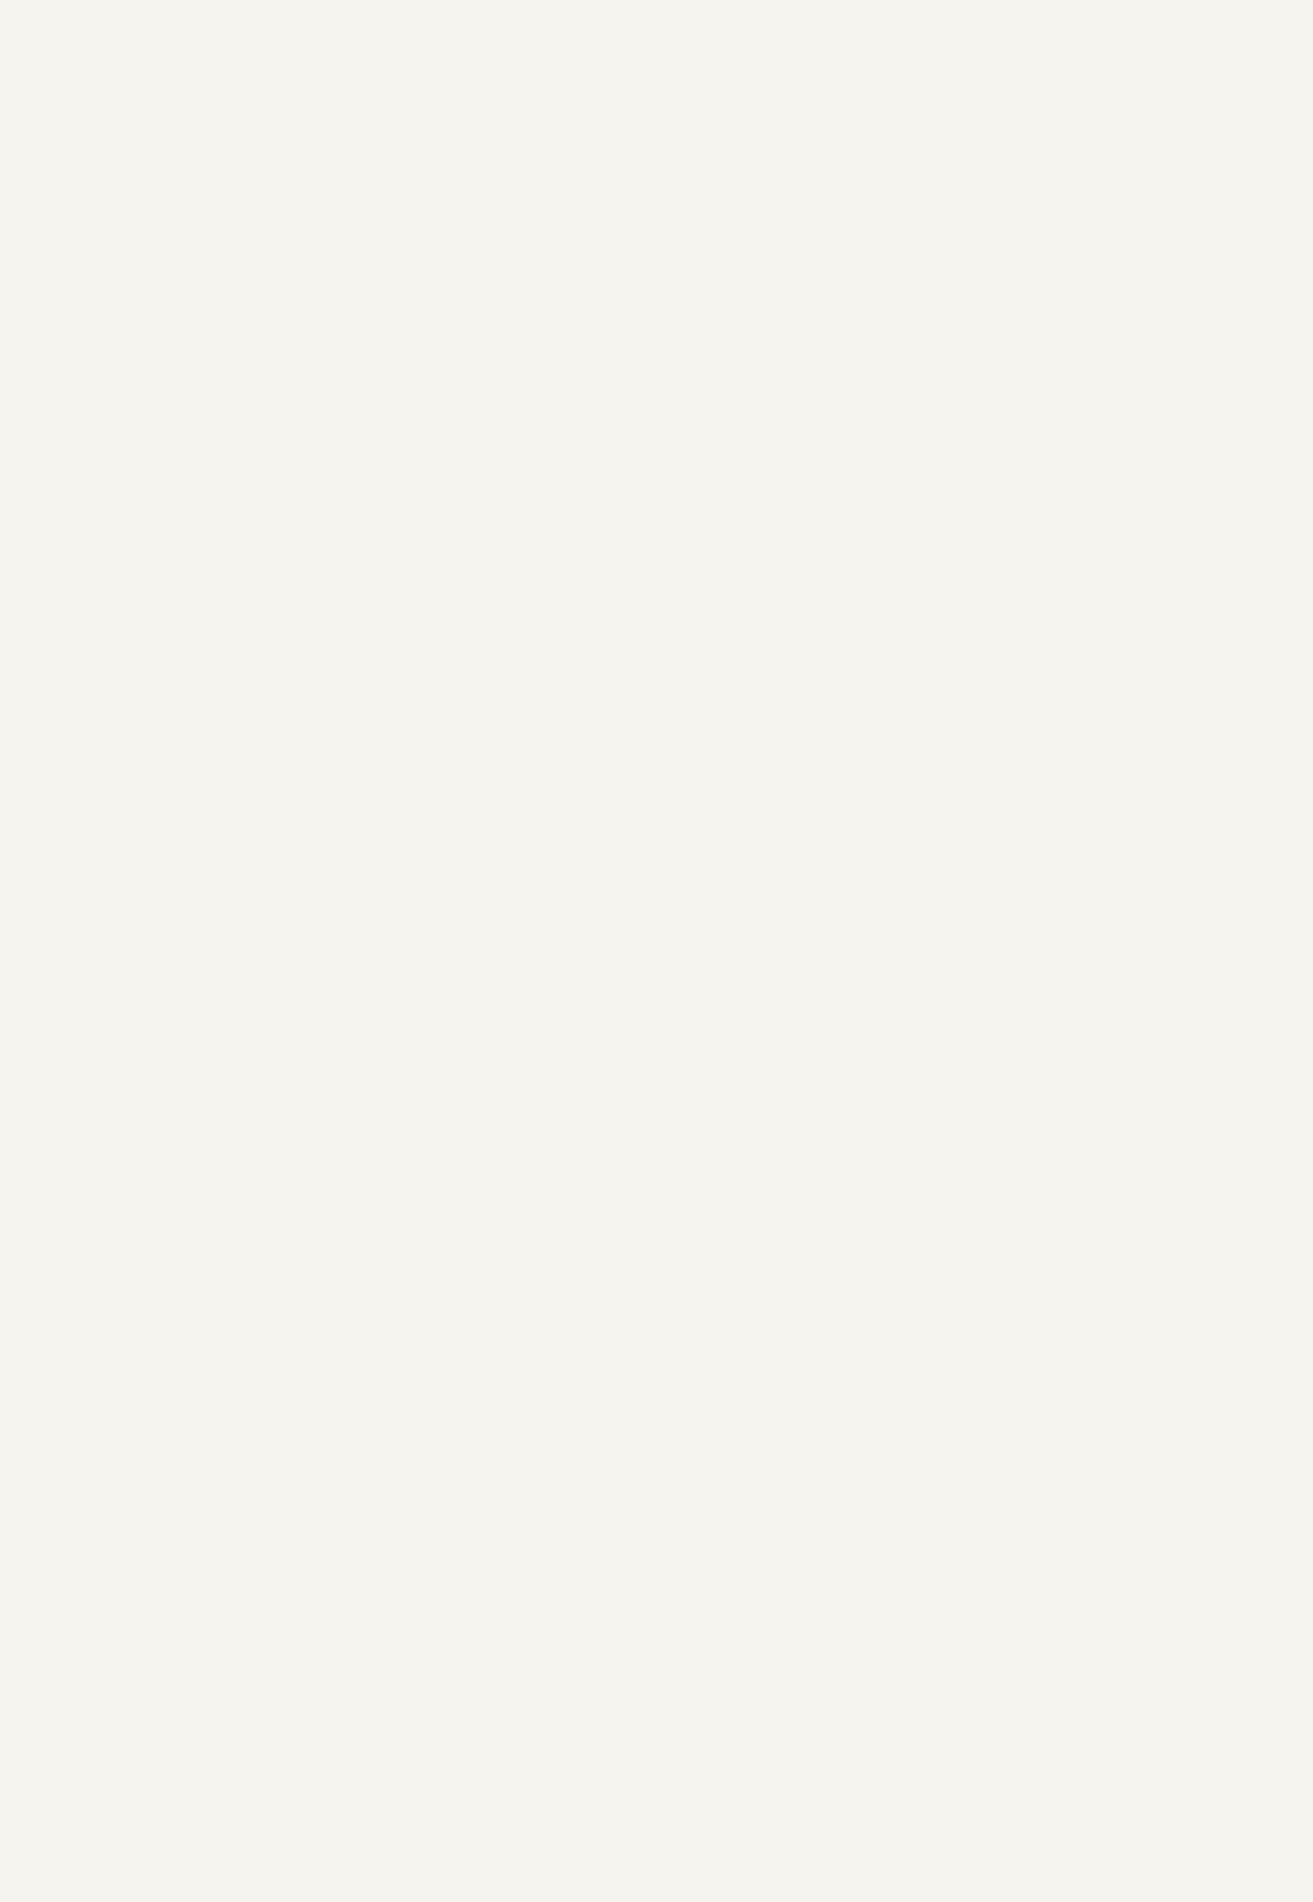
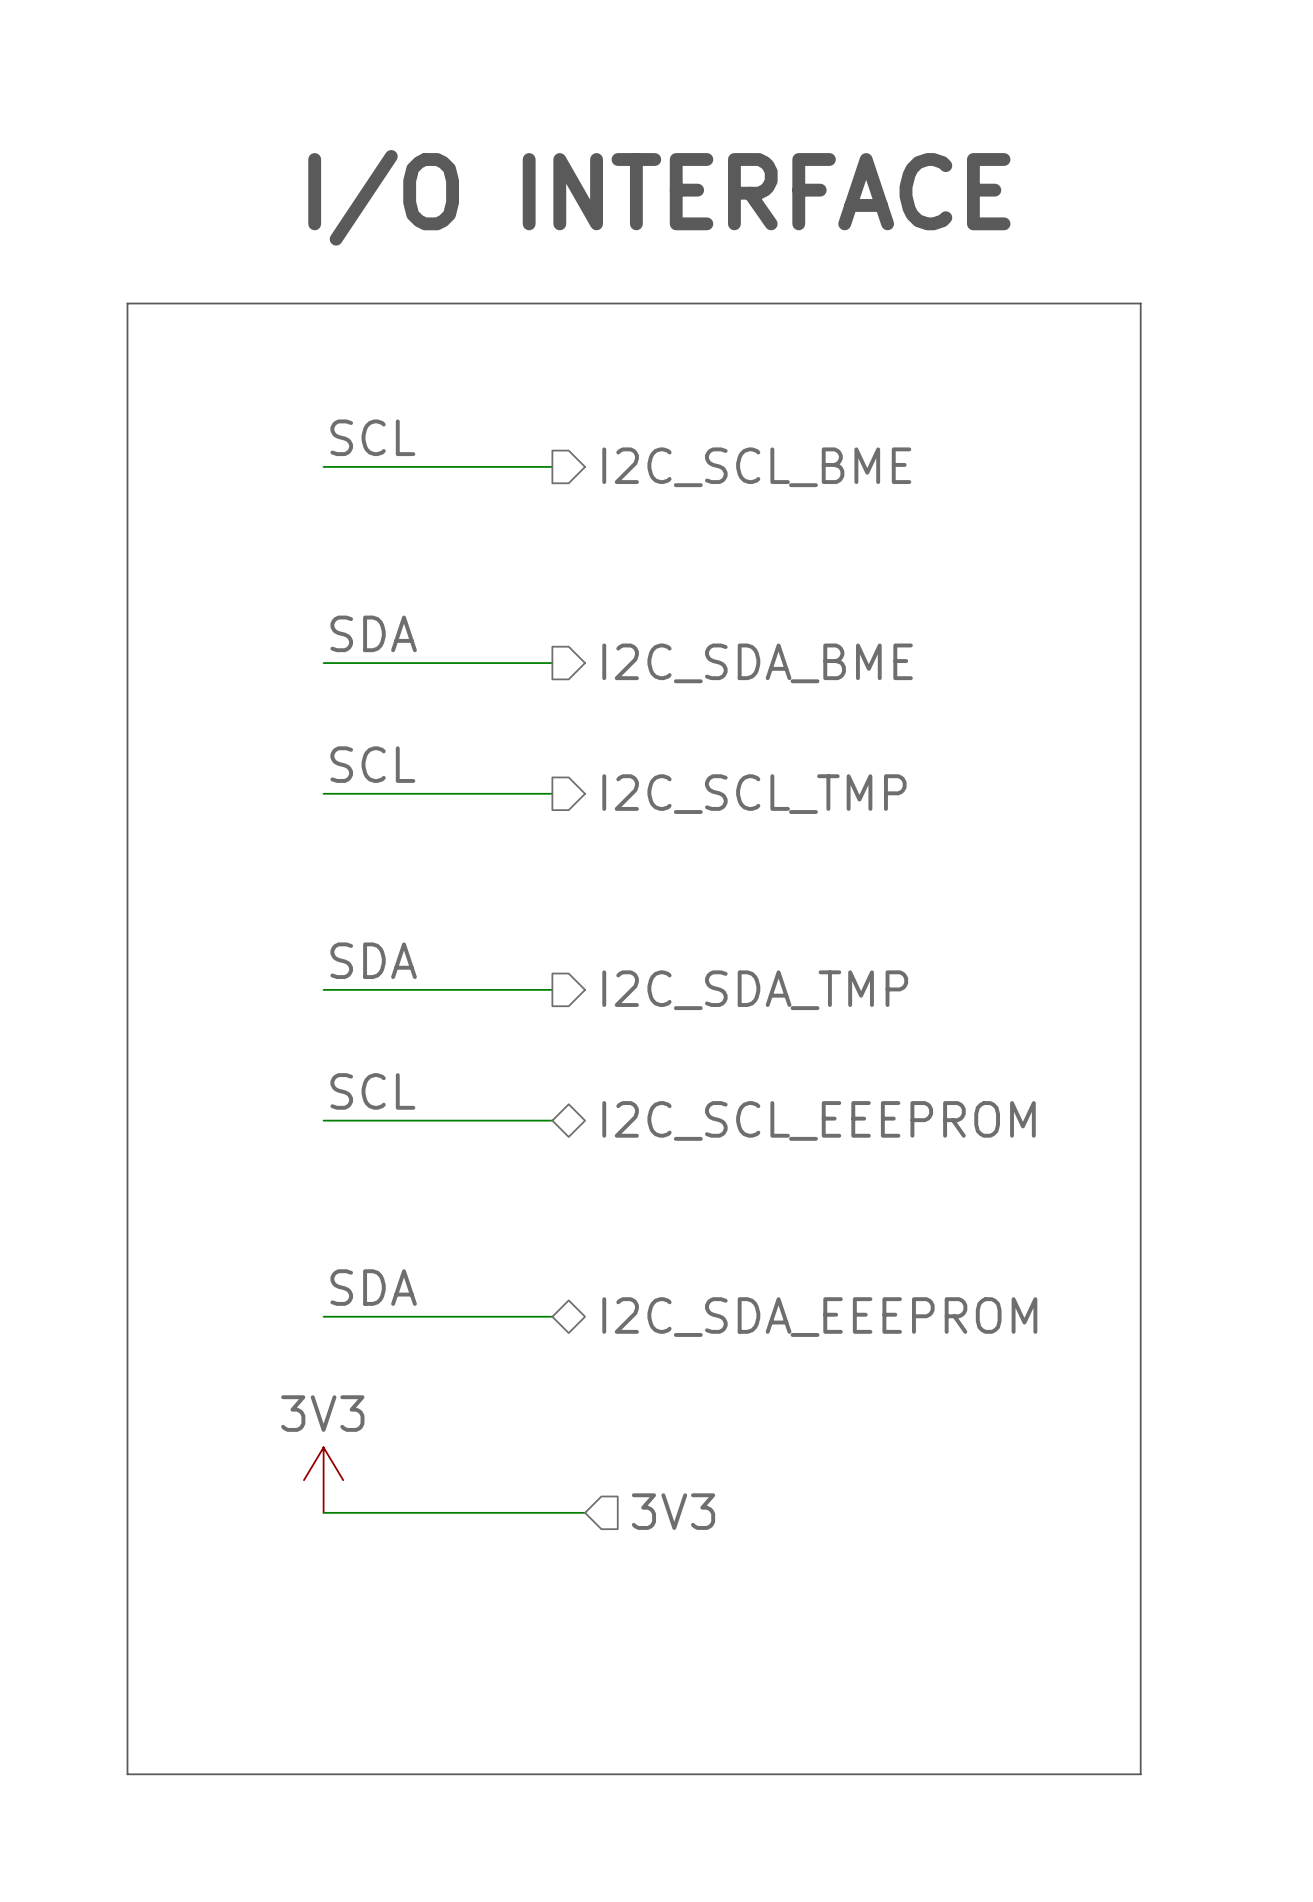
text: none -> I/O INTERFACE (659, 197)
line: none -> (127, 303) (1140, 303) (1140, 1774) (127, 1774) (127, 303)
label: none -> SCL (372, 437)
wire: none -> (323, 466) (552, 466)
hierarchical label: none -> I2C_SCL_BME (756, 467)
label: none -> SDA (373, 633)
wire: none -> (323, 663) (552, 663)
hierarchical label: none -> I2C_SDA_BME (757, 663)
label: none -> SCL (372, 764)
wire: none -> (323, 793) (552, 793)
hierarchical label: none -> I2C_SCL_TMP (754, 794)
label: none -> SDA (373, 960)
wire: none -> (323, 989) (552, 989)
hierarchical label: none -> I2C_SDA_TMP (755, 990)
label: none -> SCL (372, 1091)
wire: none -> (323, 1120) (552, 1120)
hierarchical label: none -> I2C_SCL_EEEPROM (819, 1120)
label: none -> SDA (373, 1287)
wire: none -> (323, 1316) (552, 1316)
hierarchical label: none -> I2C_SDA_EEEPROM (819, 1317)
power symbol: none -> 3V3 (323, 1480)
hierarchical label: none -> 3V3 (673, 1511)
wire: none -> (323, 1512) (585, 1512)

